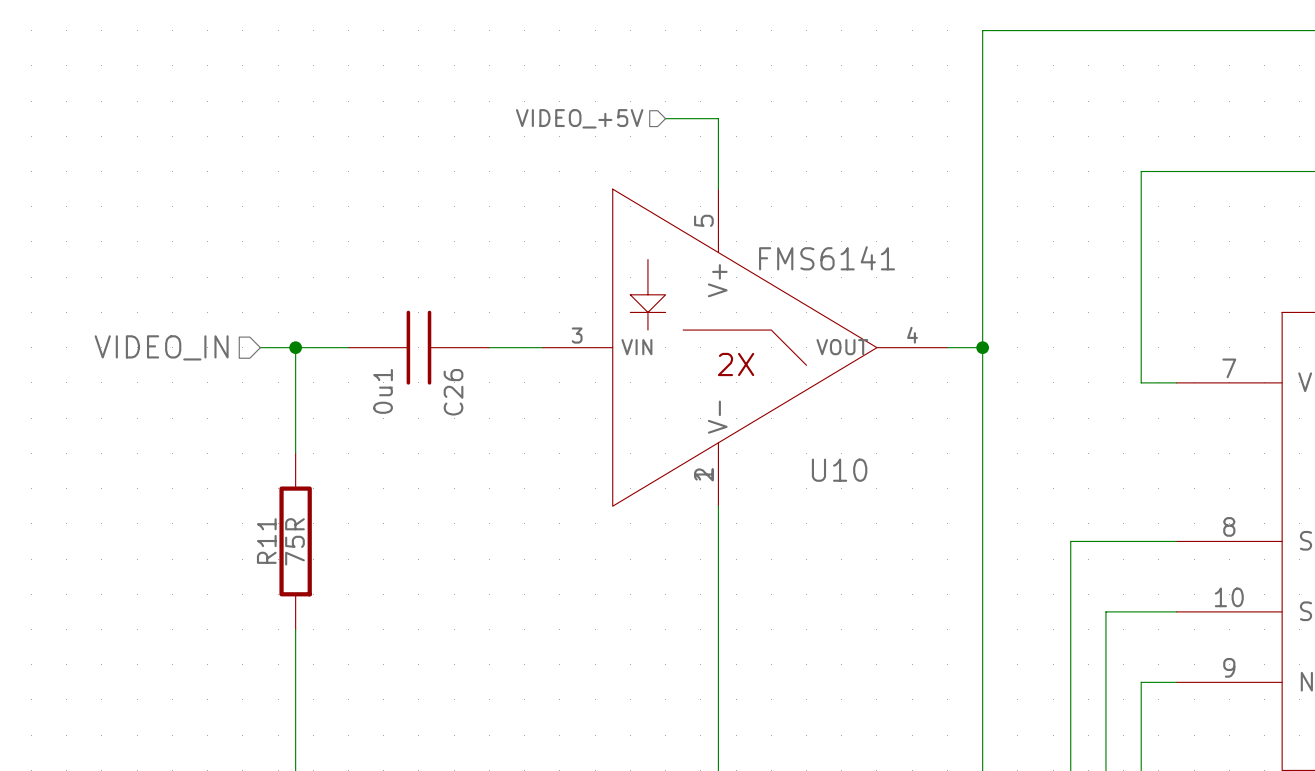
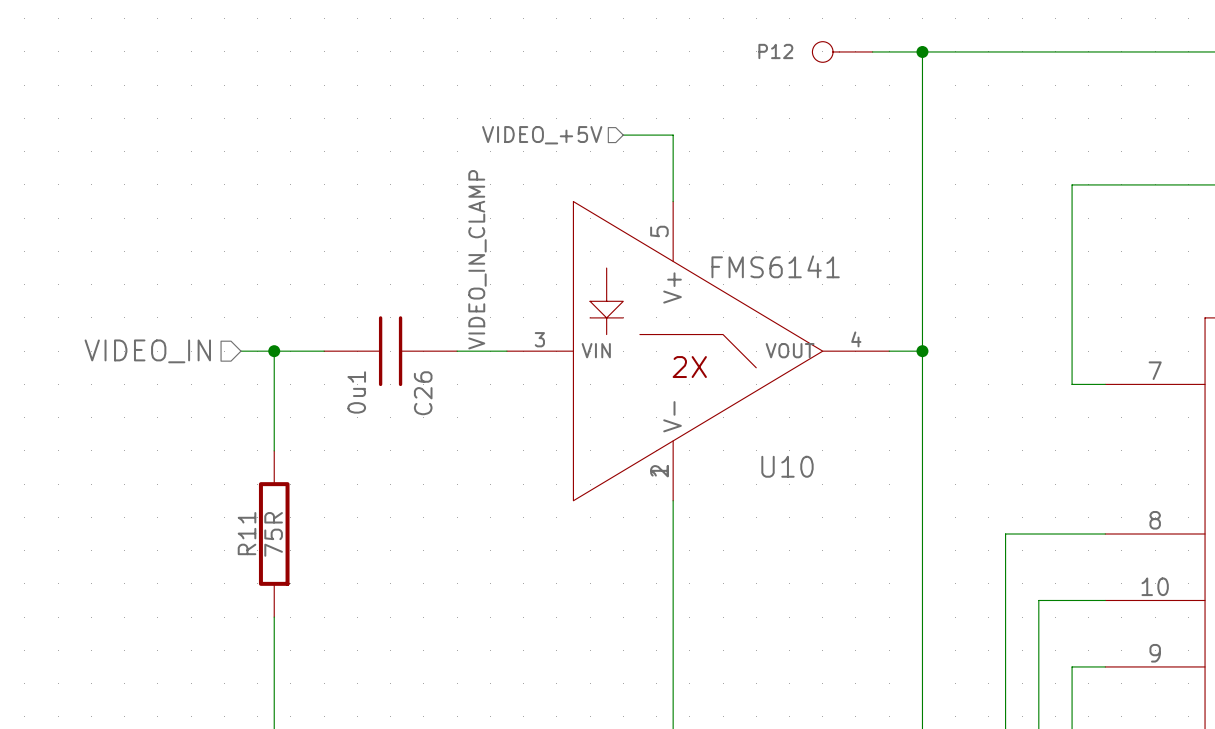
P12: none -> (842, 51)
wire: none -> (872, 51) (922, 51)
junction: none -> (922, 51)
label: none -> VIDEO_IN_CLAMP (477, 259)

